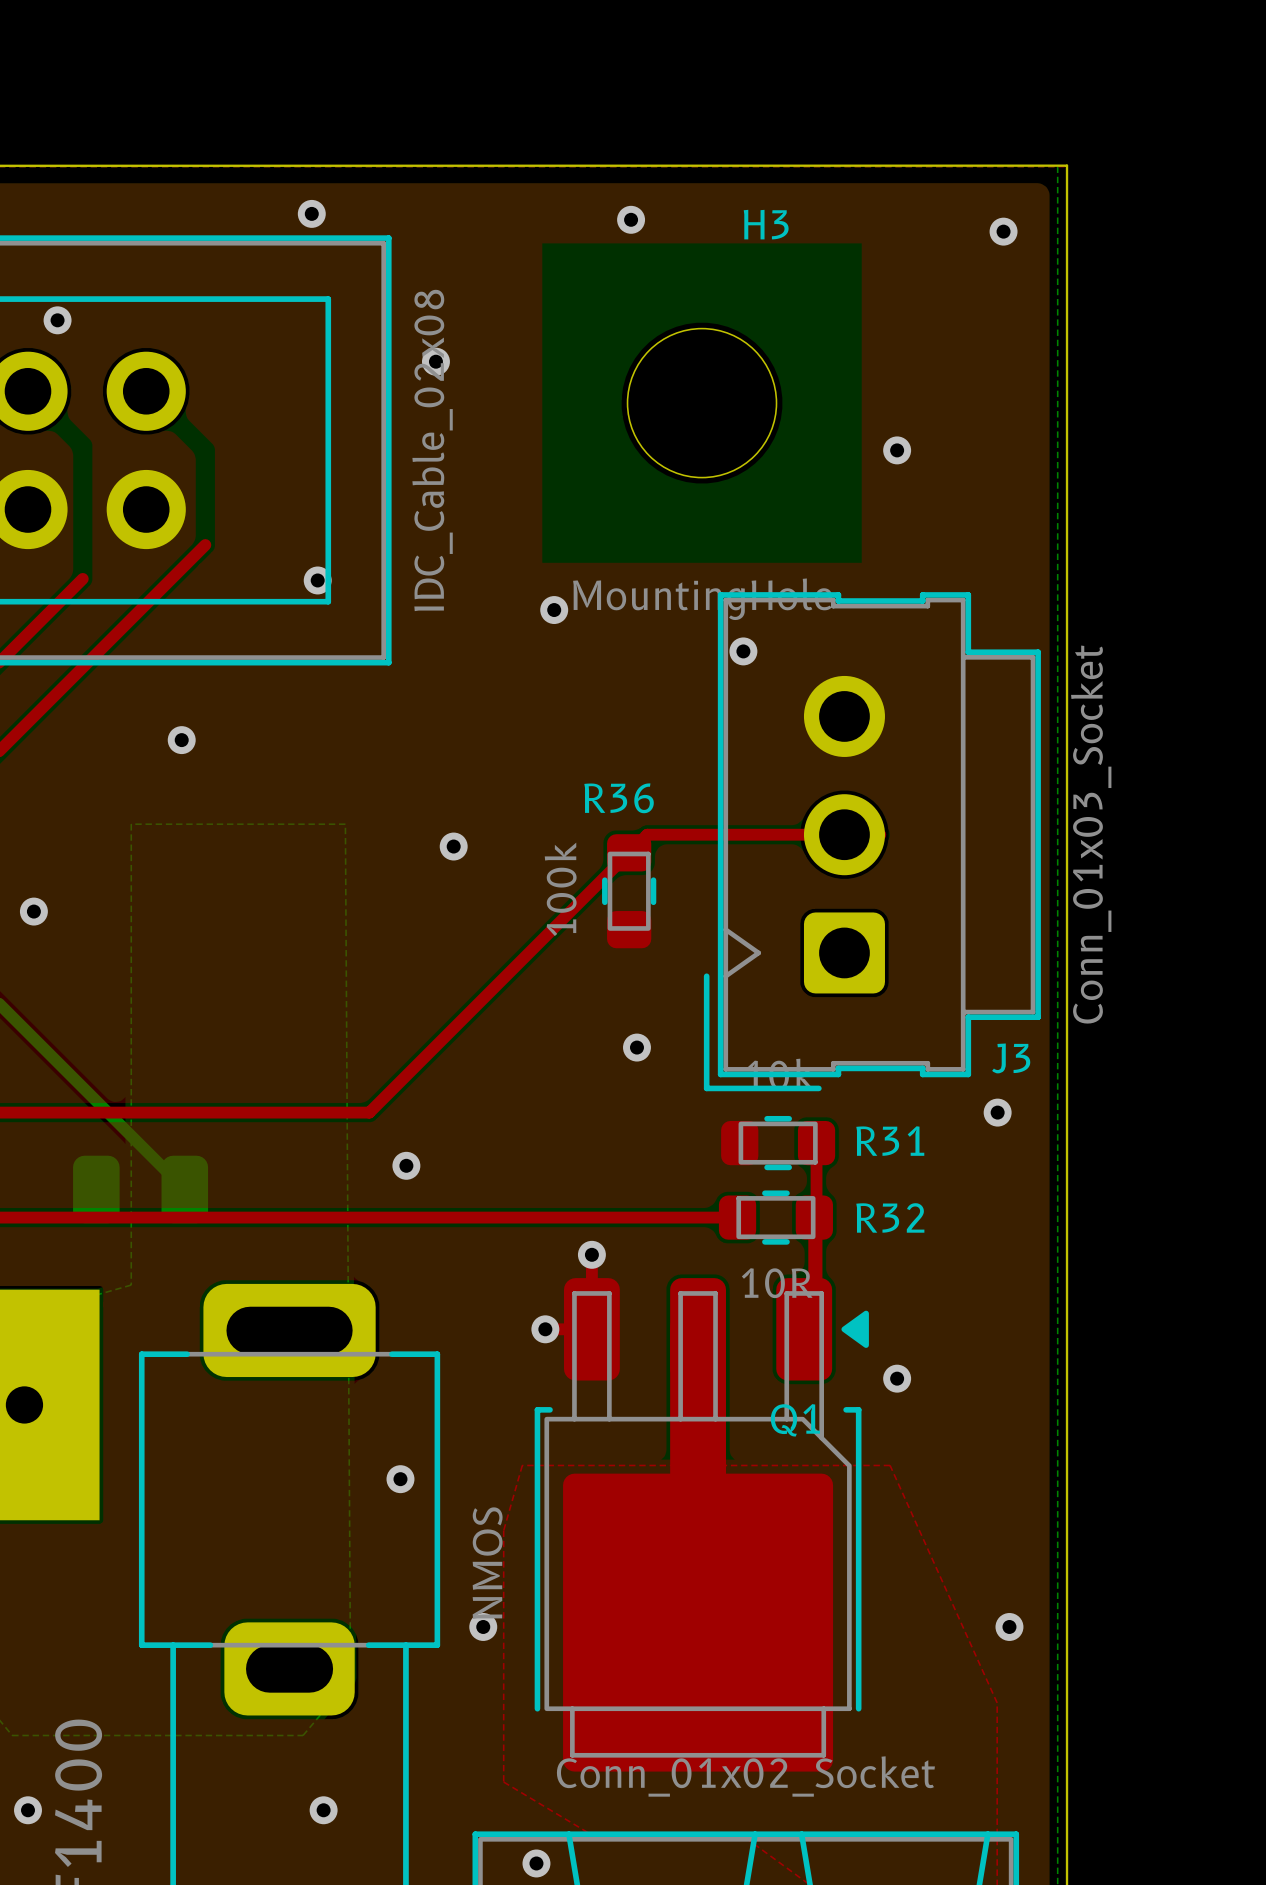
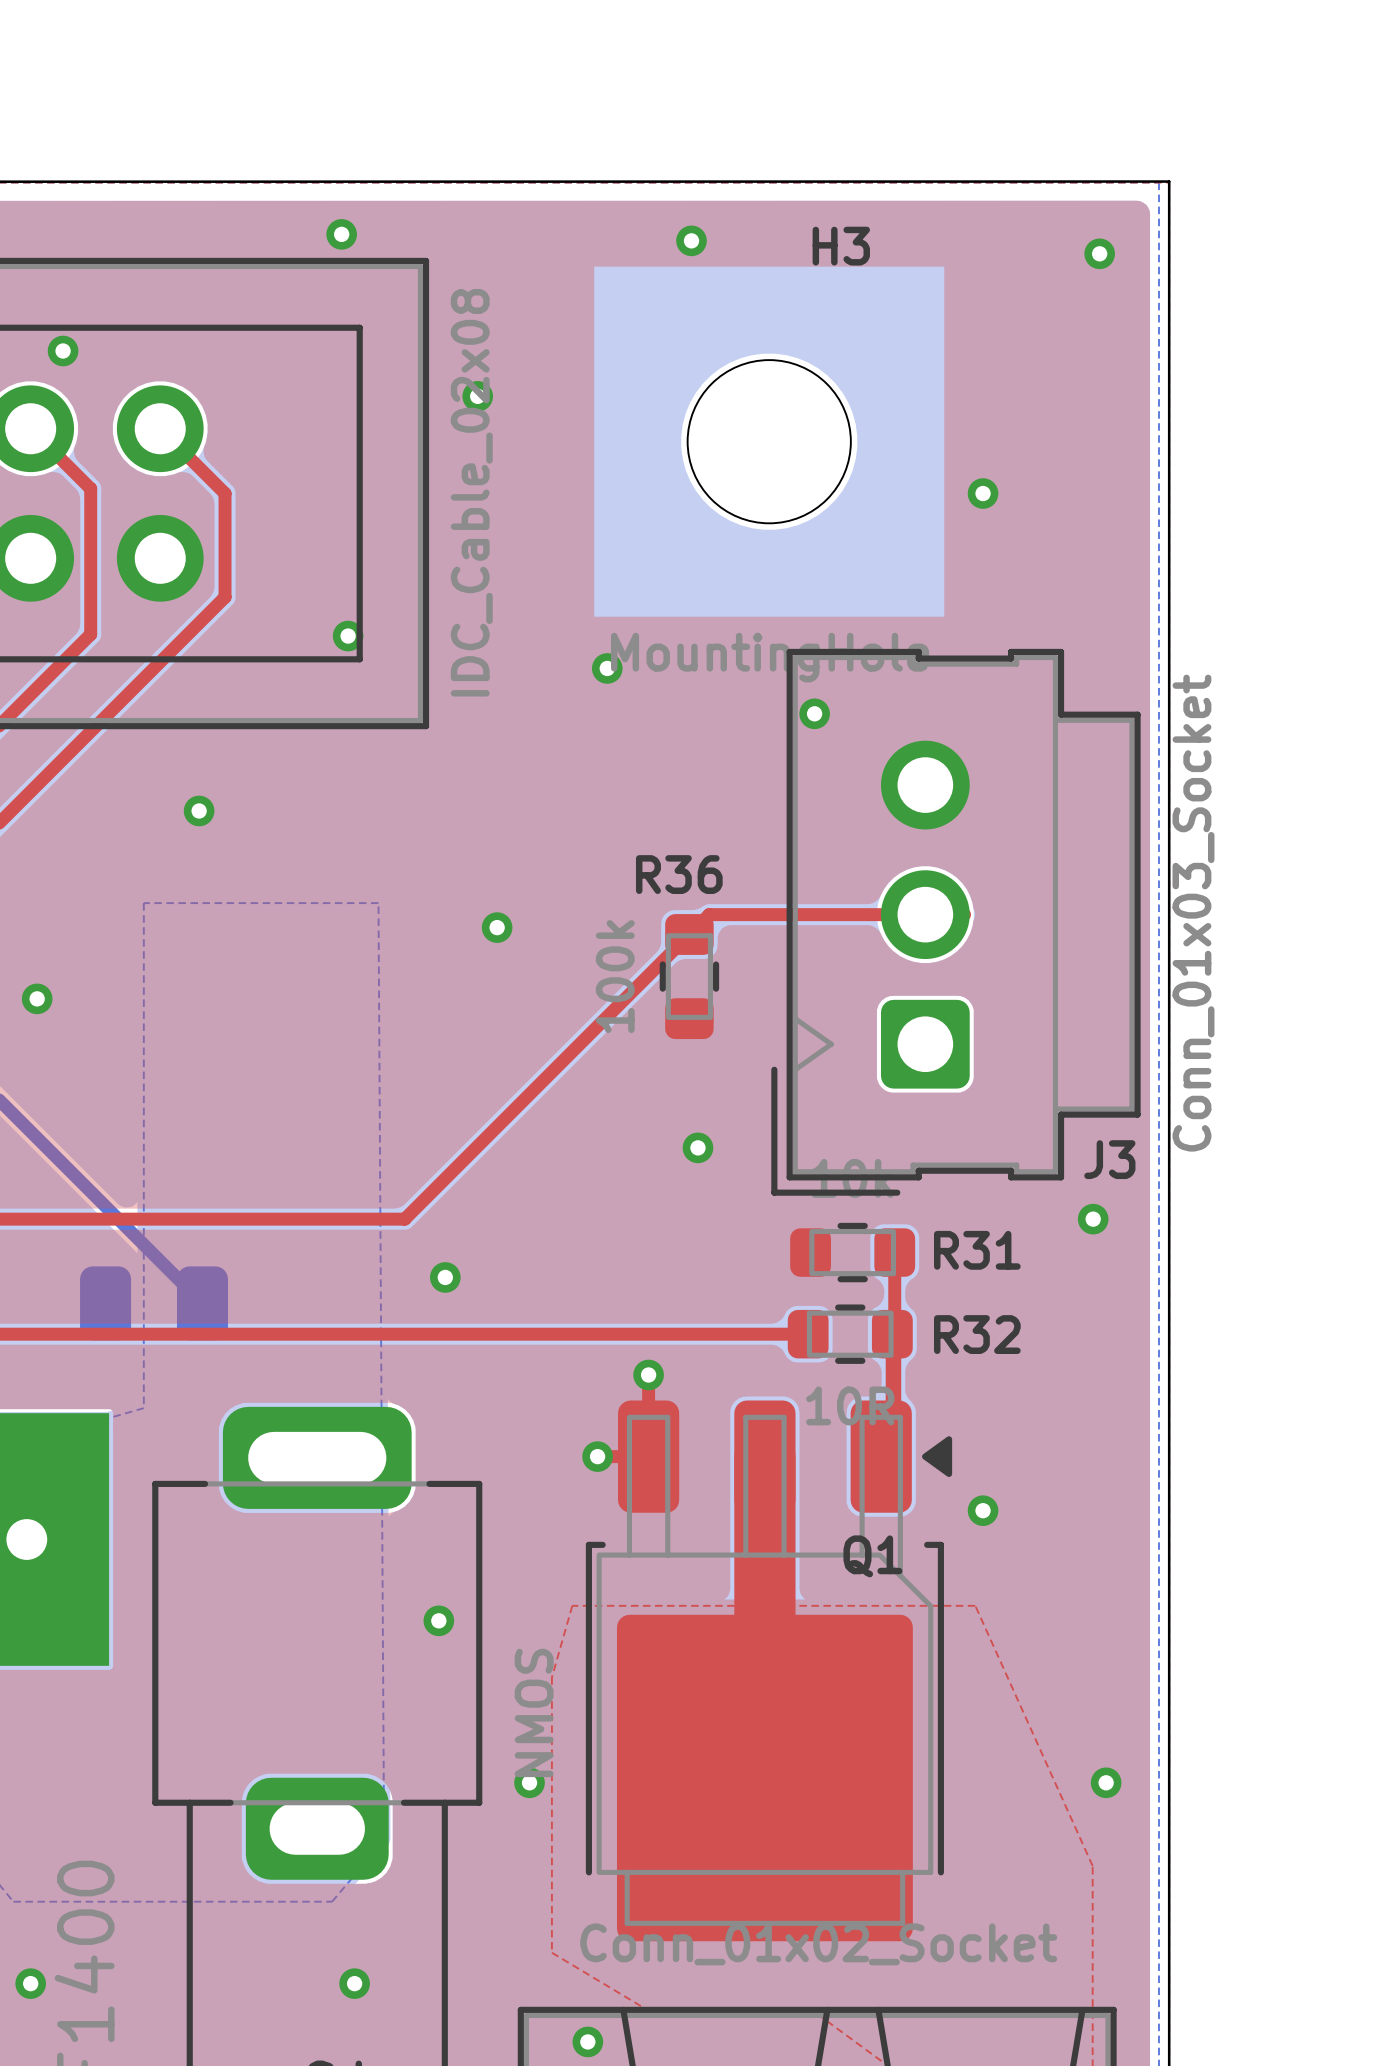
top track: none -> (30, 428) (90, 488) (90, 634)
top track: none -> (160, 428) (225, 493) (225, 597)

